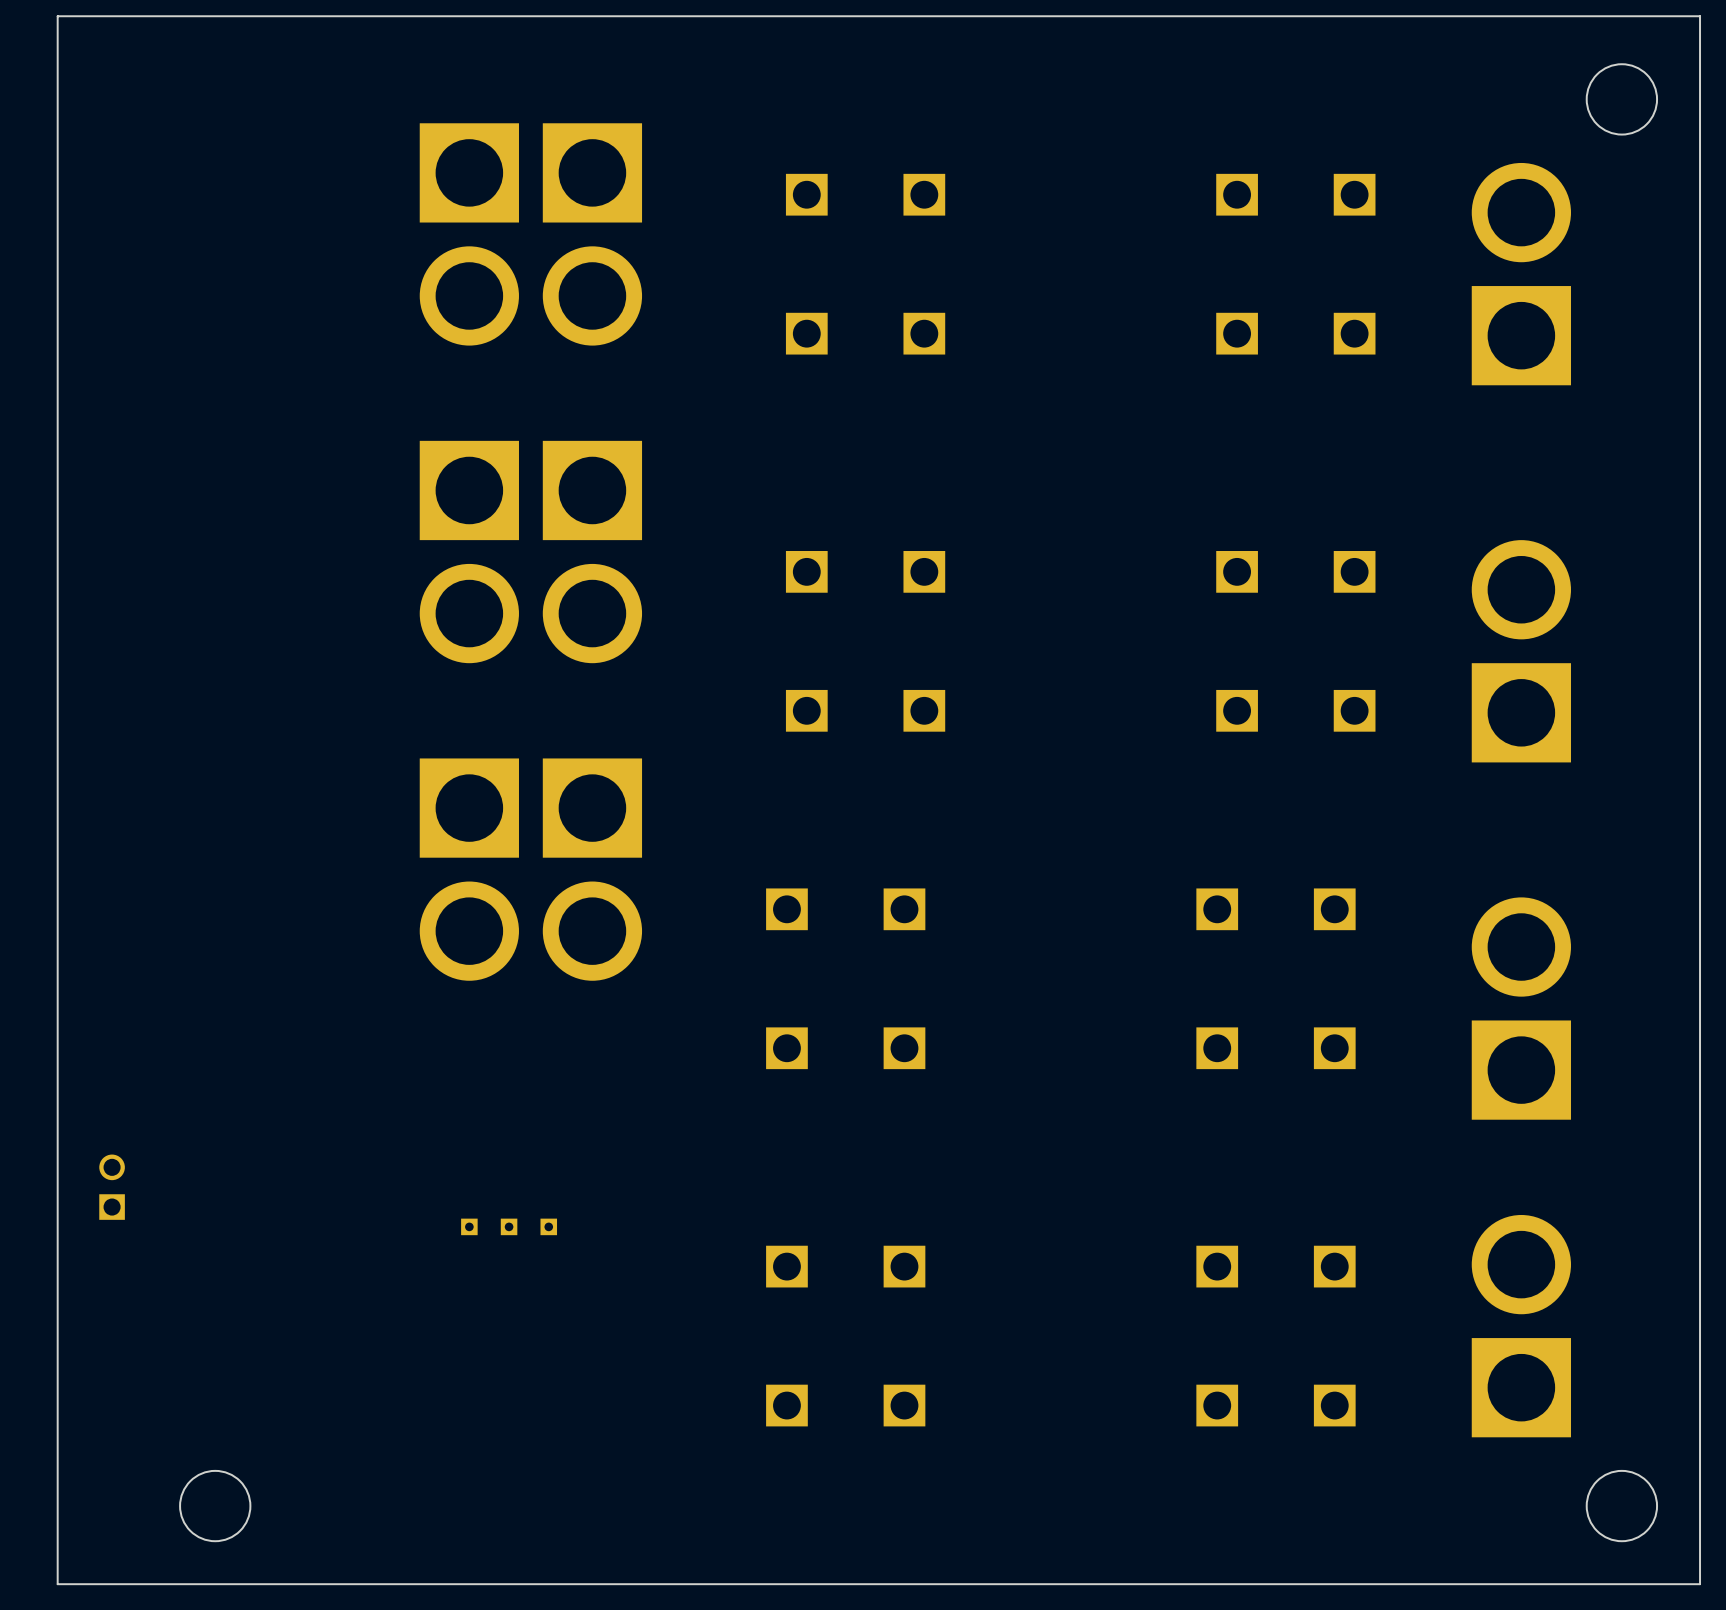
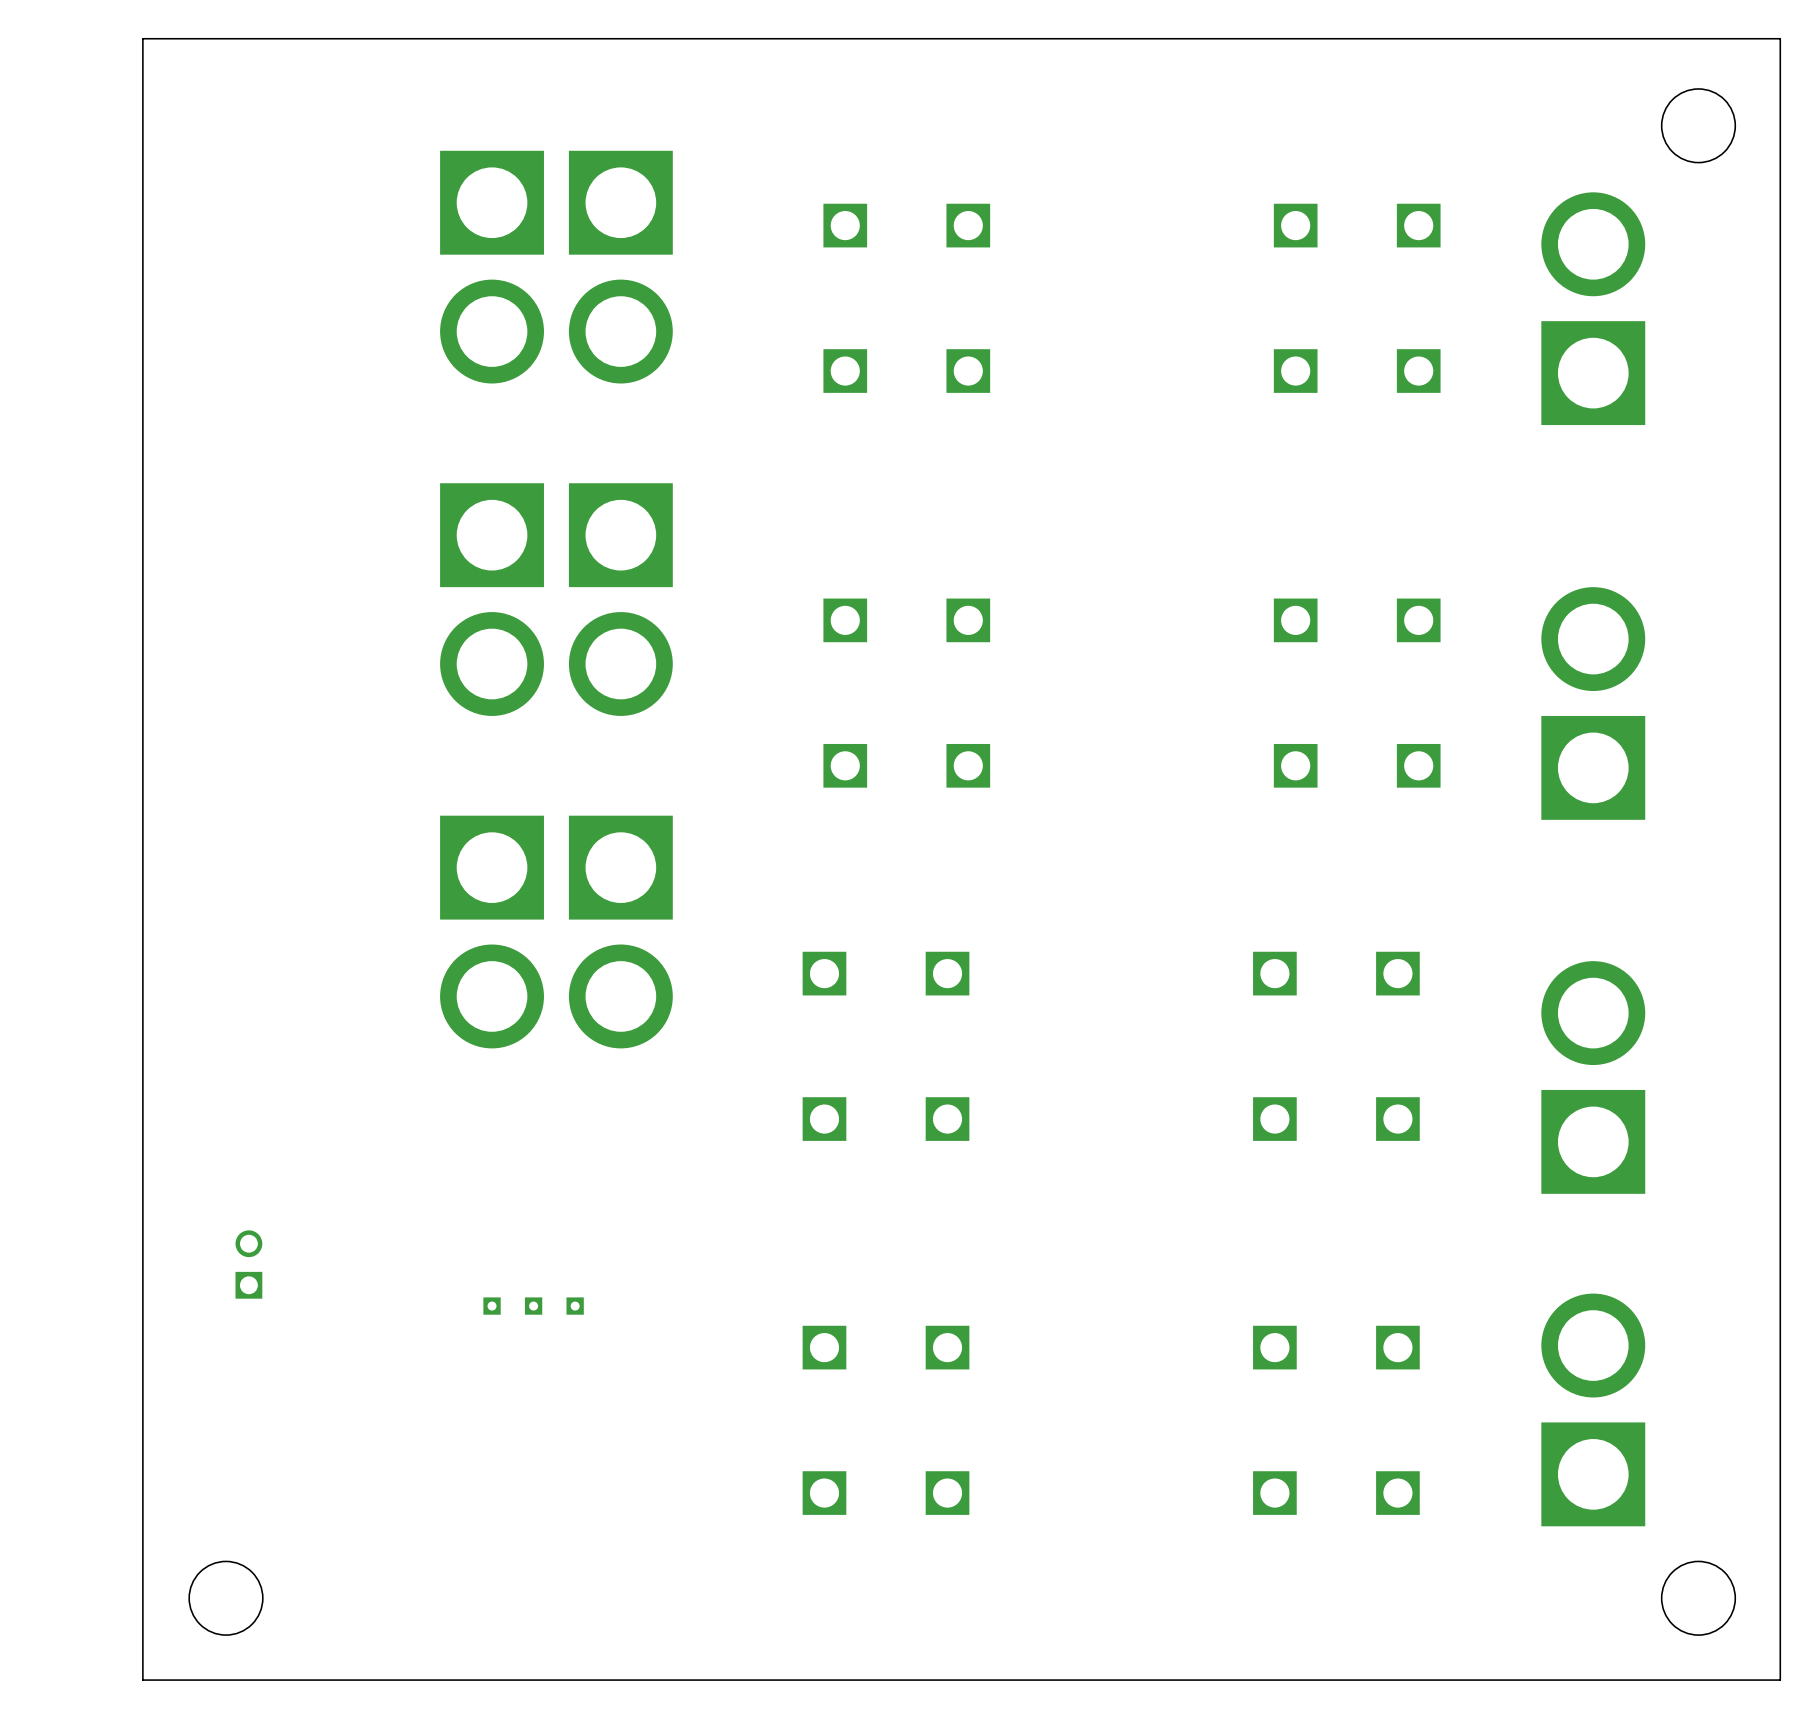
board edge: (135, 16) (57, 16) (57, 1584) (135, 1584) -> (142, 38) (142, 1680)
part position: (112, 1187) -> (248, 1264)

